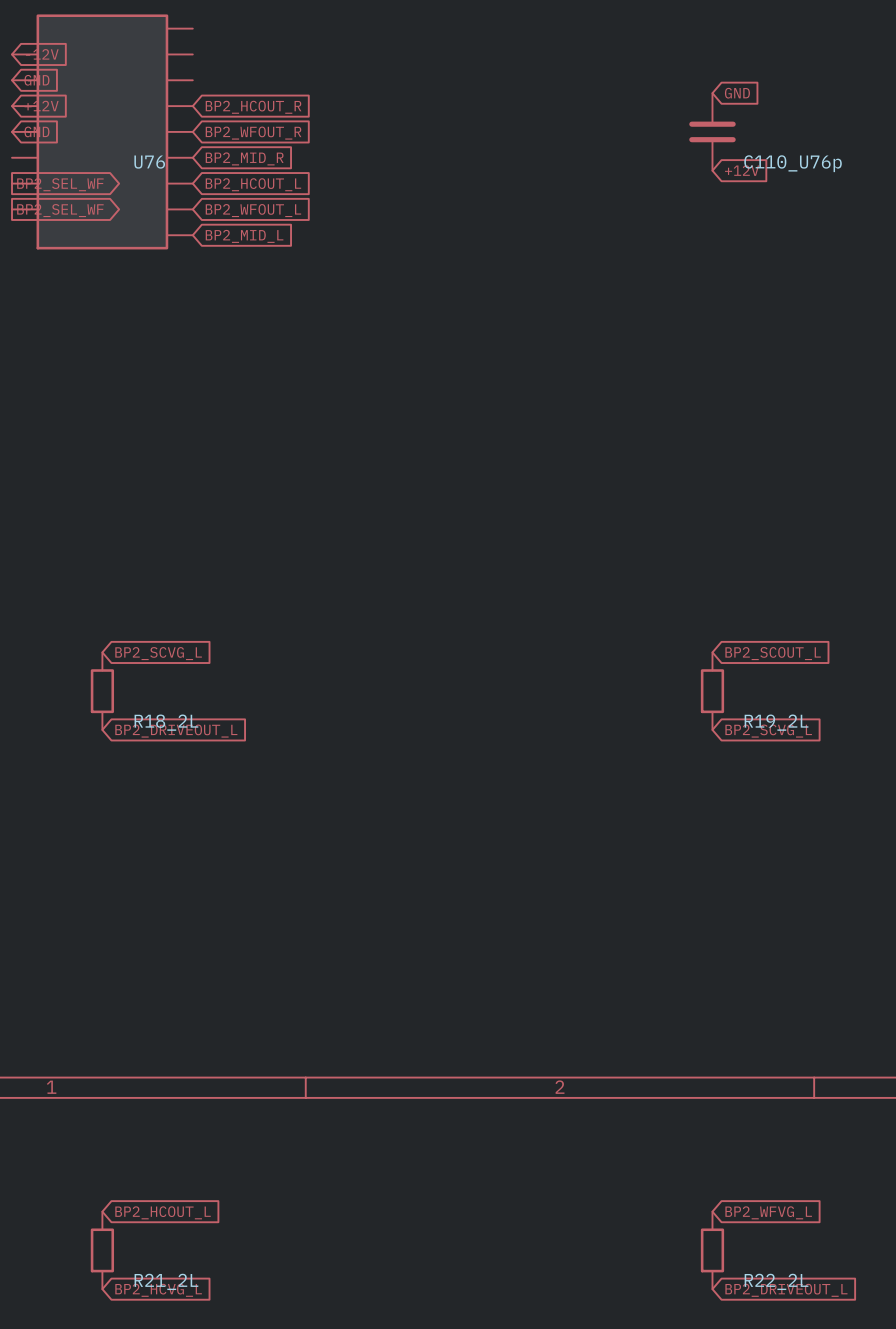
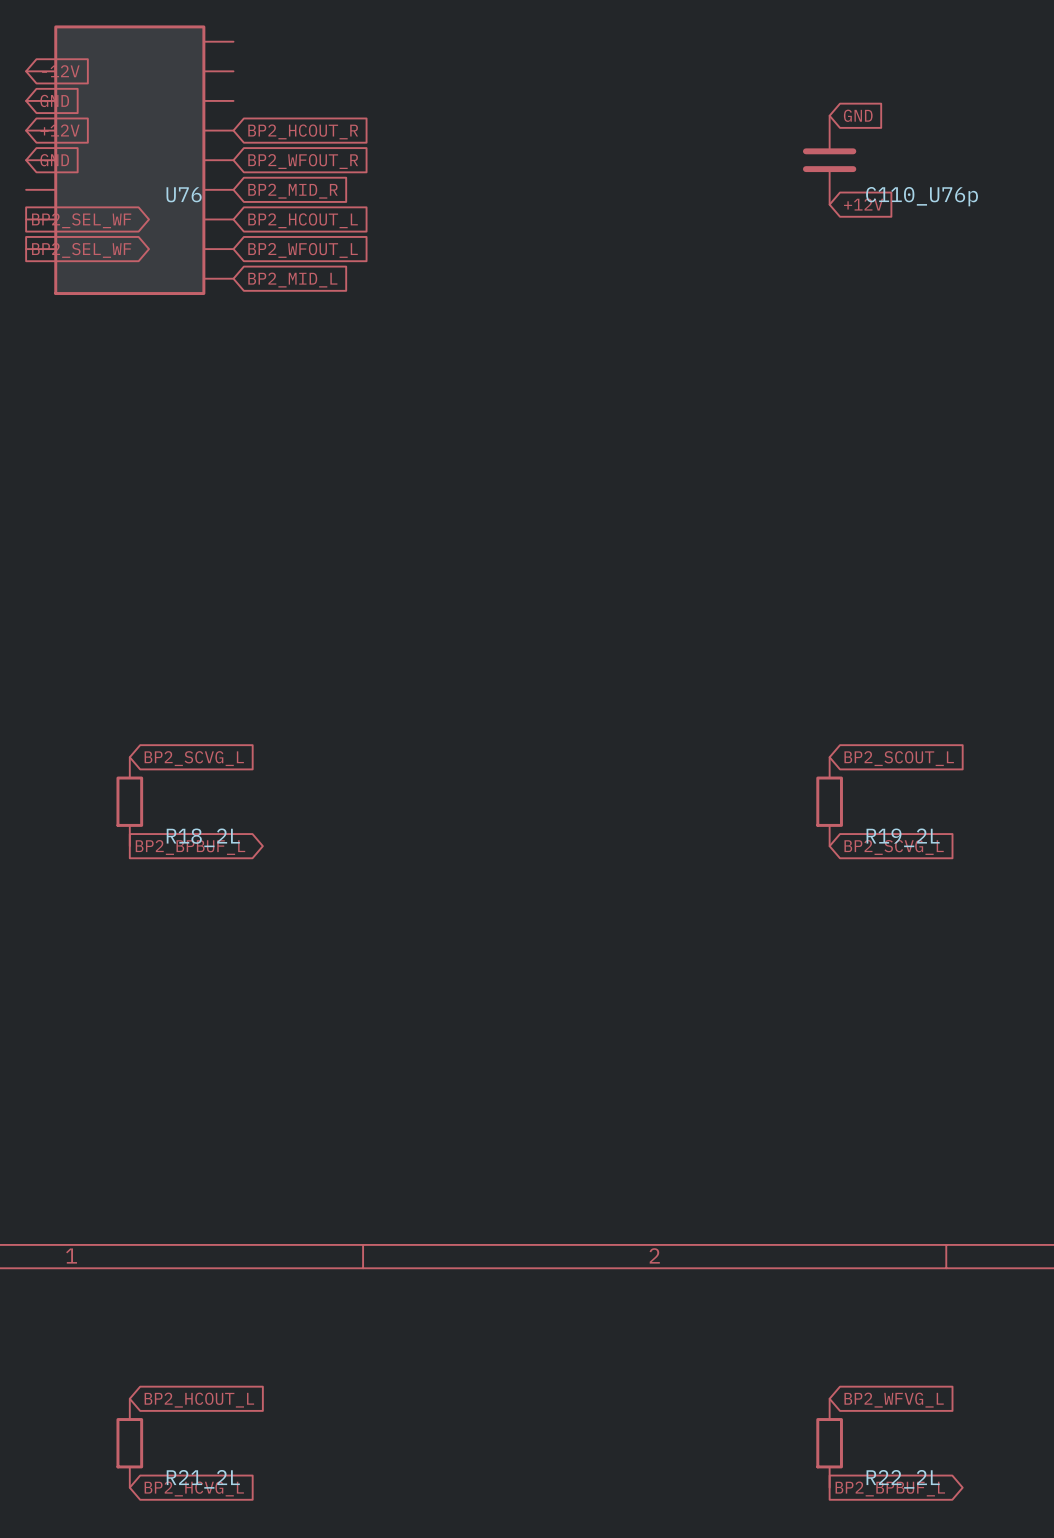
global label shape: input (176, 731) -> output (190, 847)
global label: BP2_DRIVEOUT_L (176, 731) -> BP2_BPBUF_L (190, 847)
global label shape: input (786, 1290) -> output (890, 1489)
global label: BP2_DRIVEOUT_L (786, 1290) -> BP2_BPBUF_L (890, 1489)

